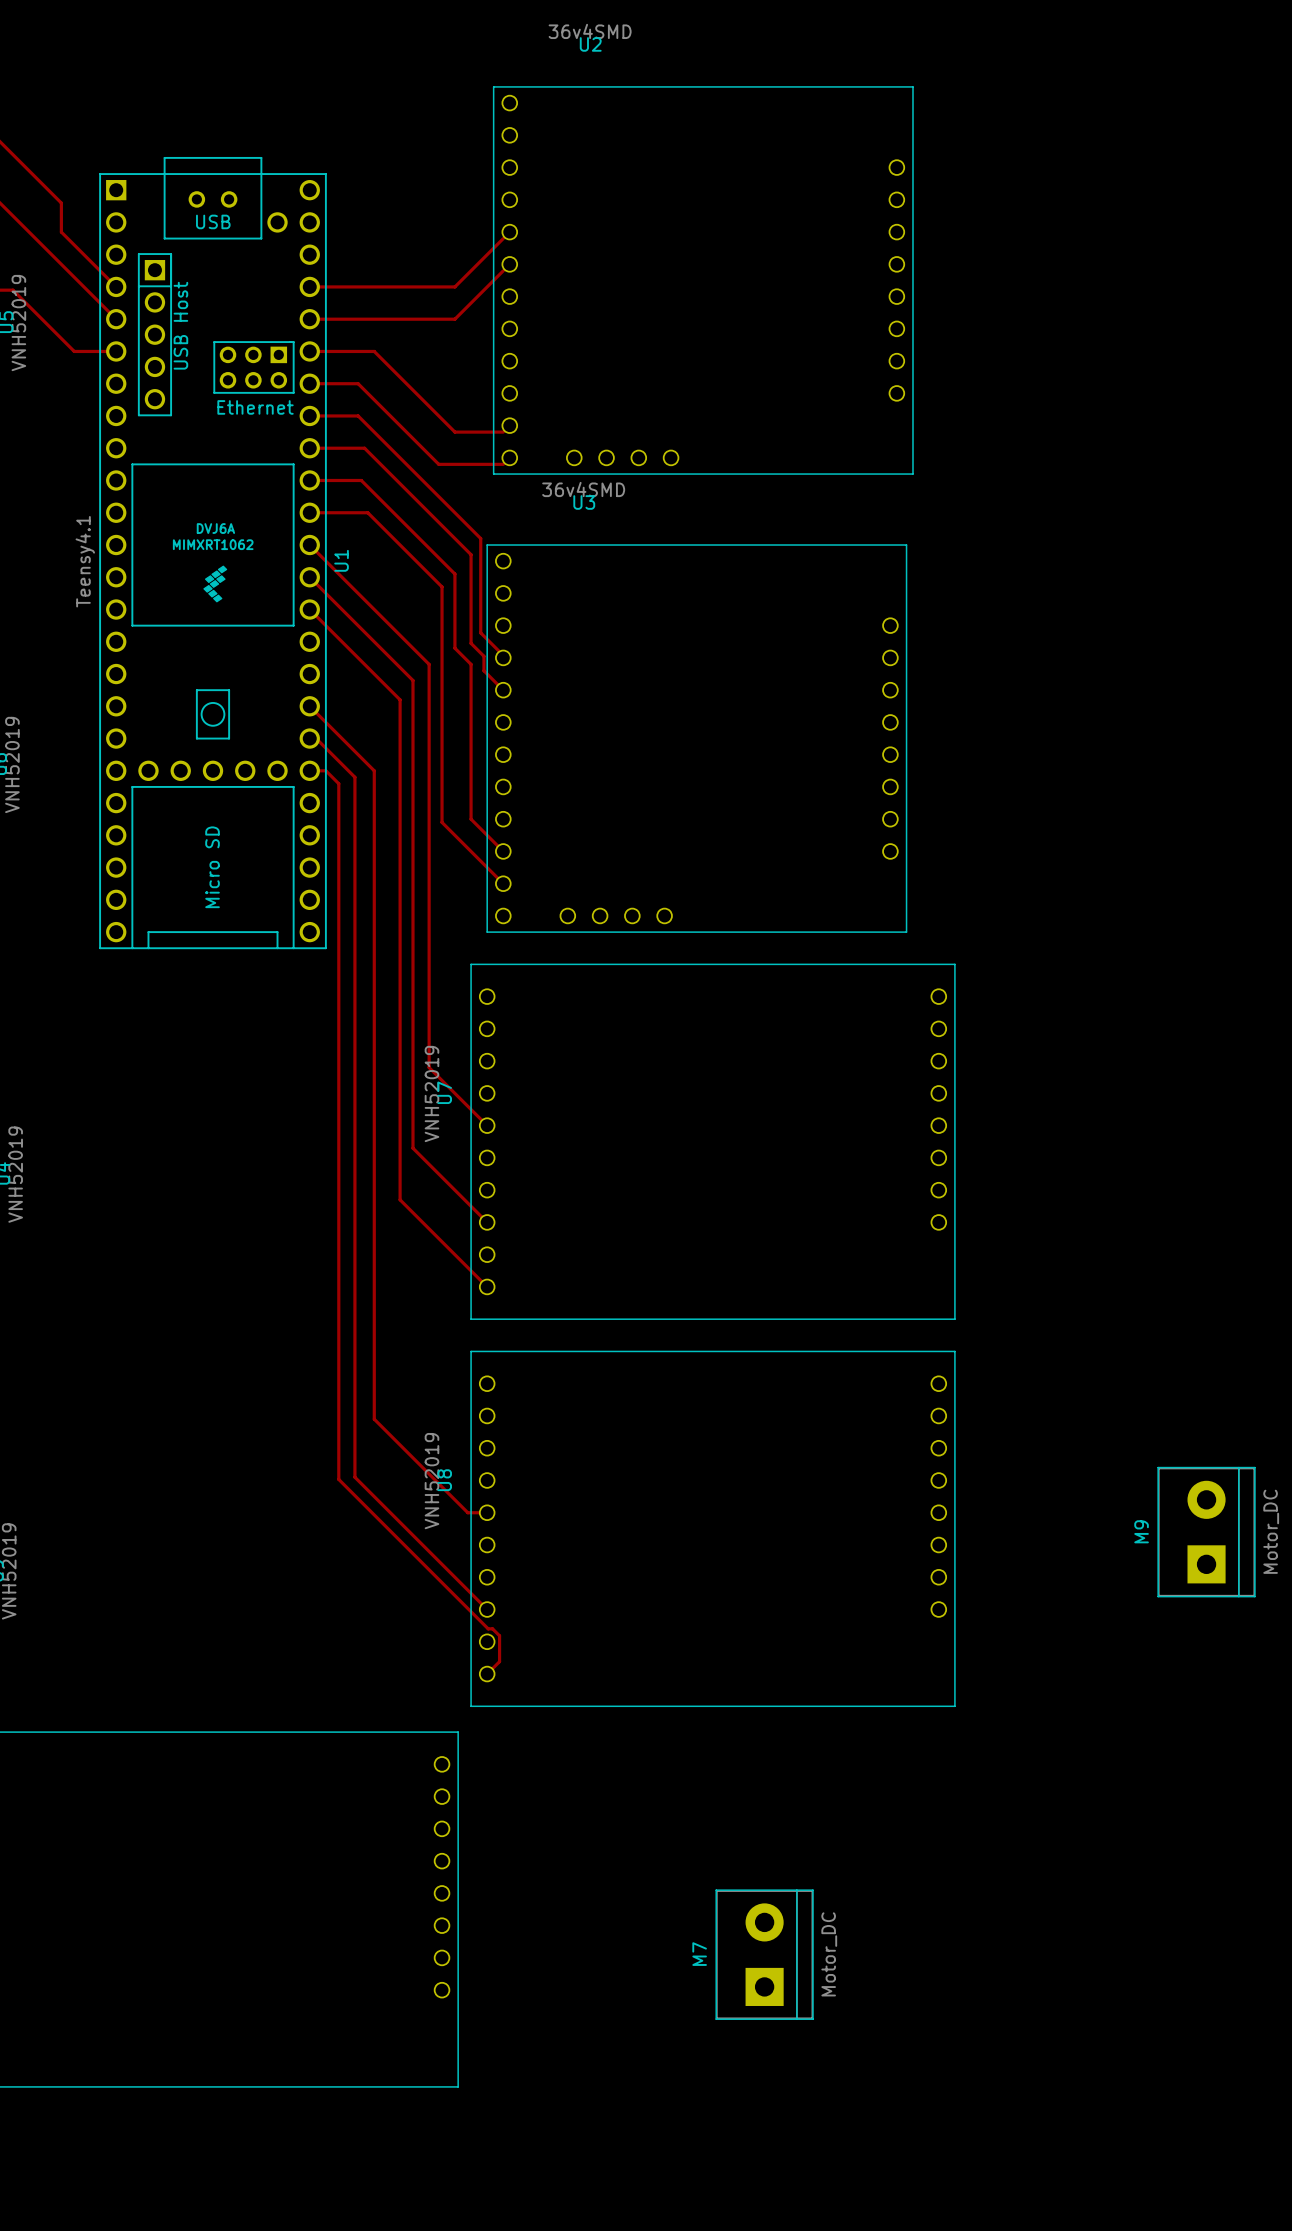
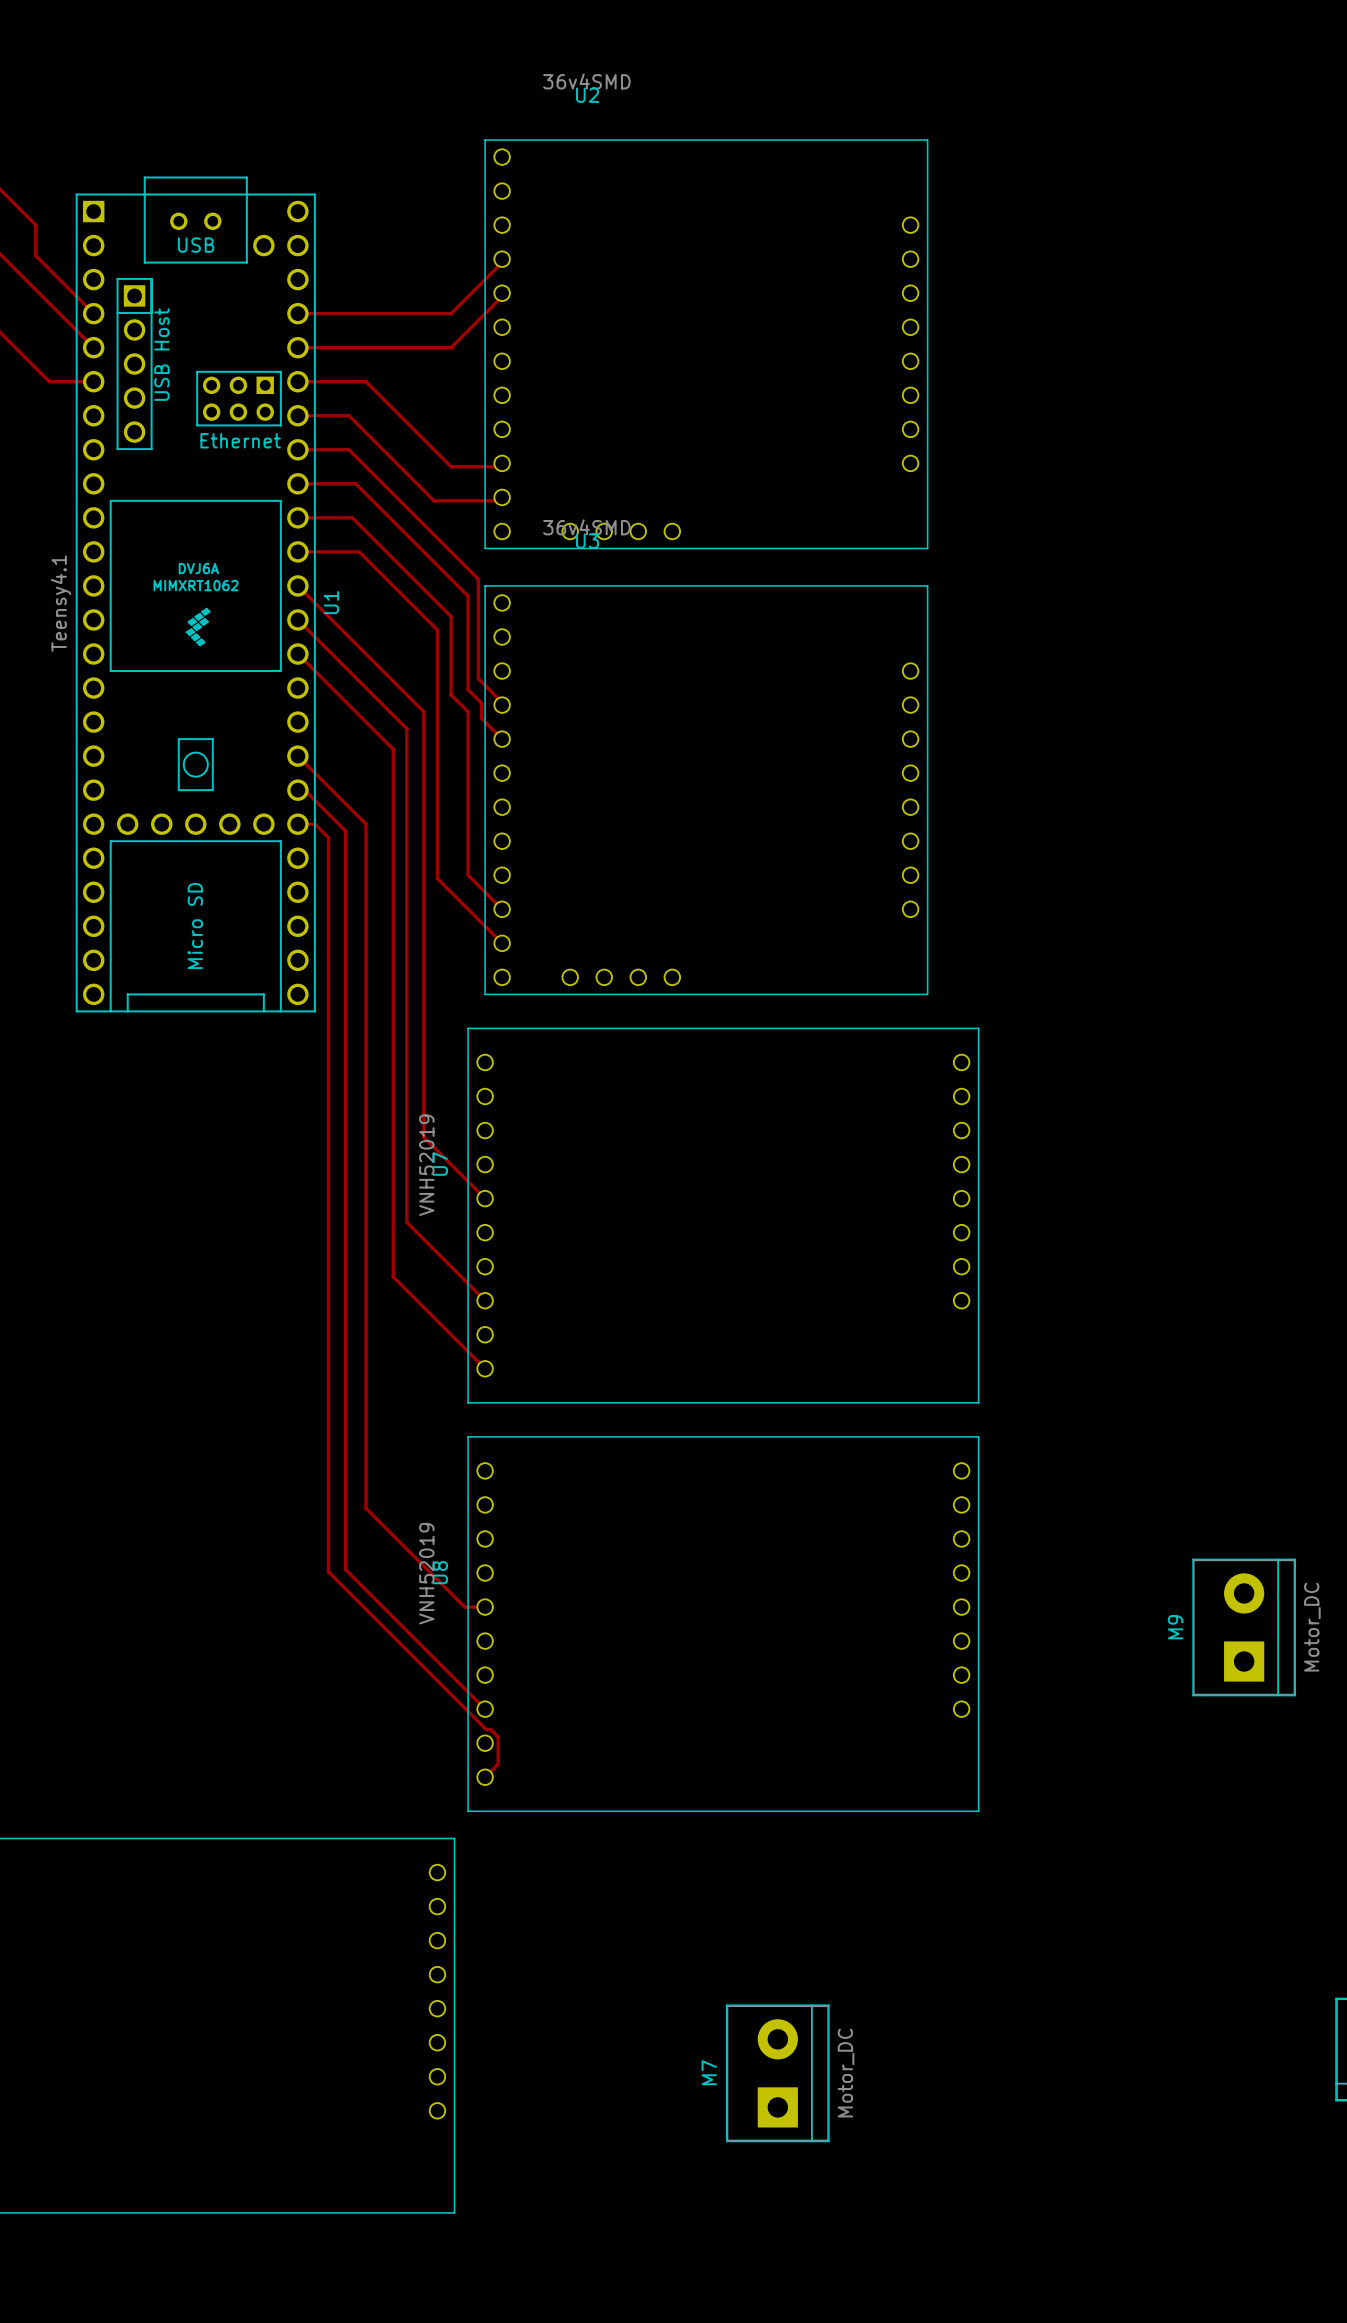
U2 position: (703, 280) -> (706, 344)

